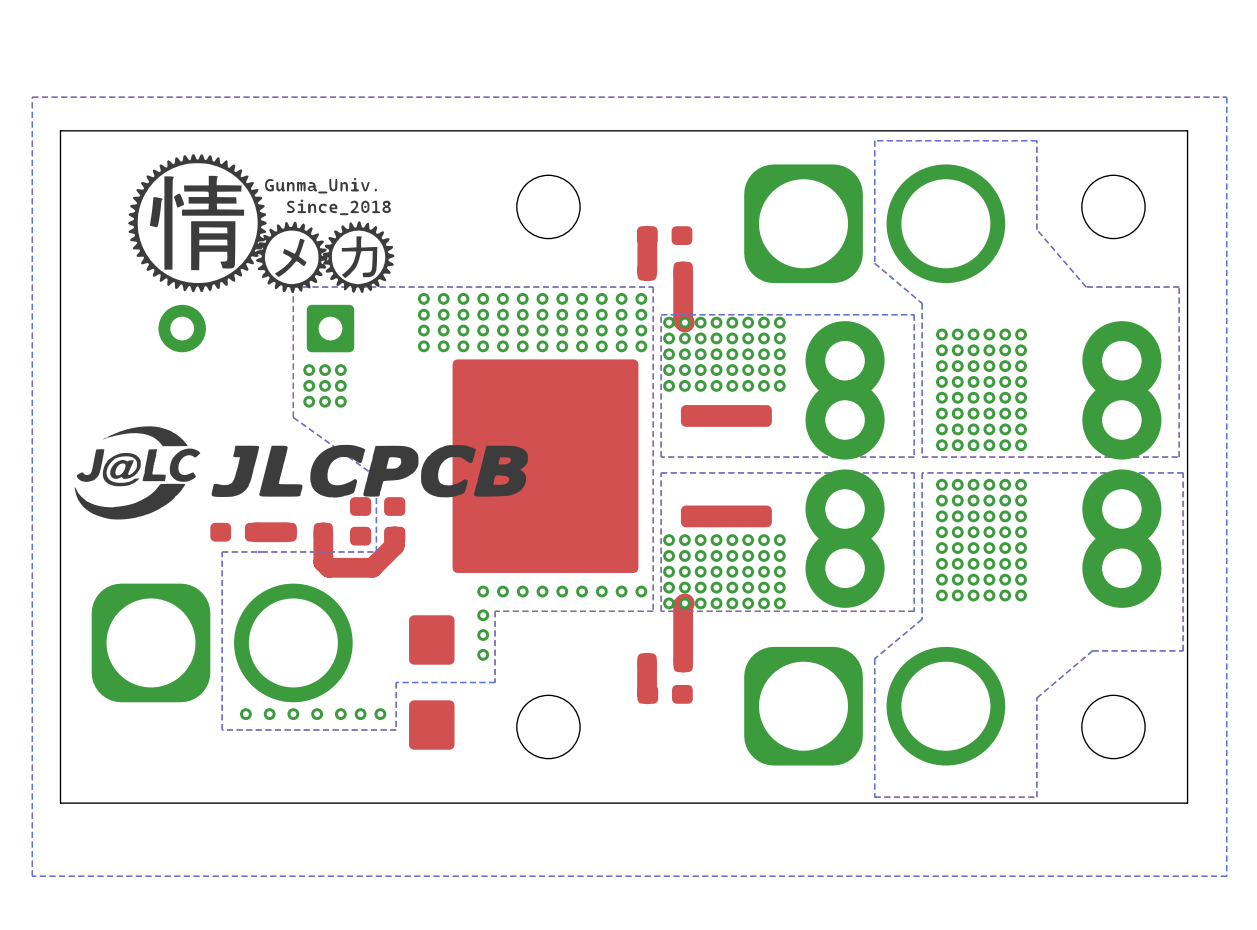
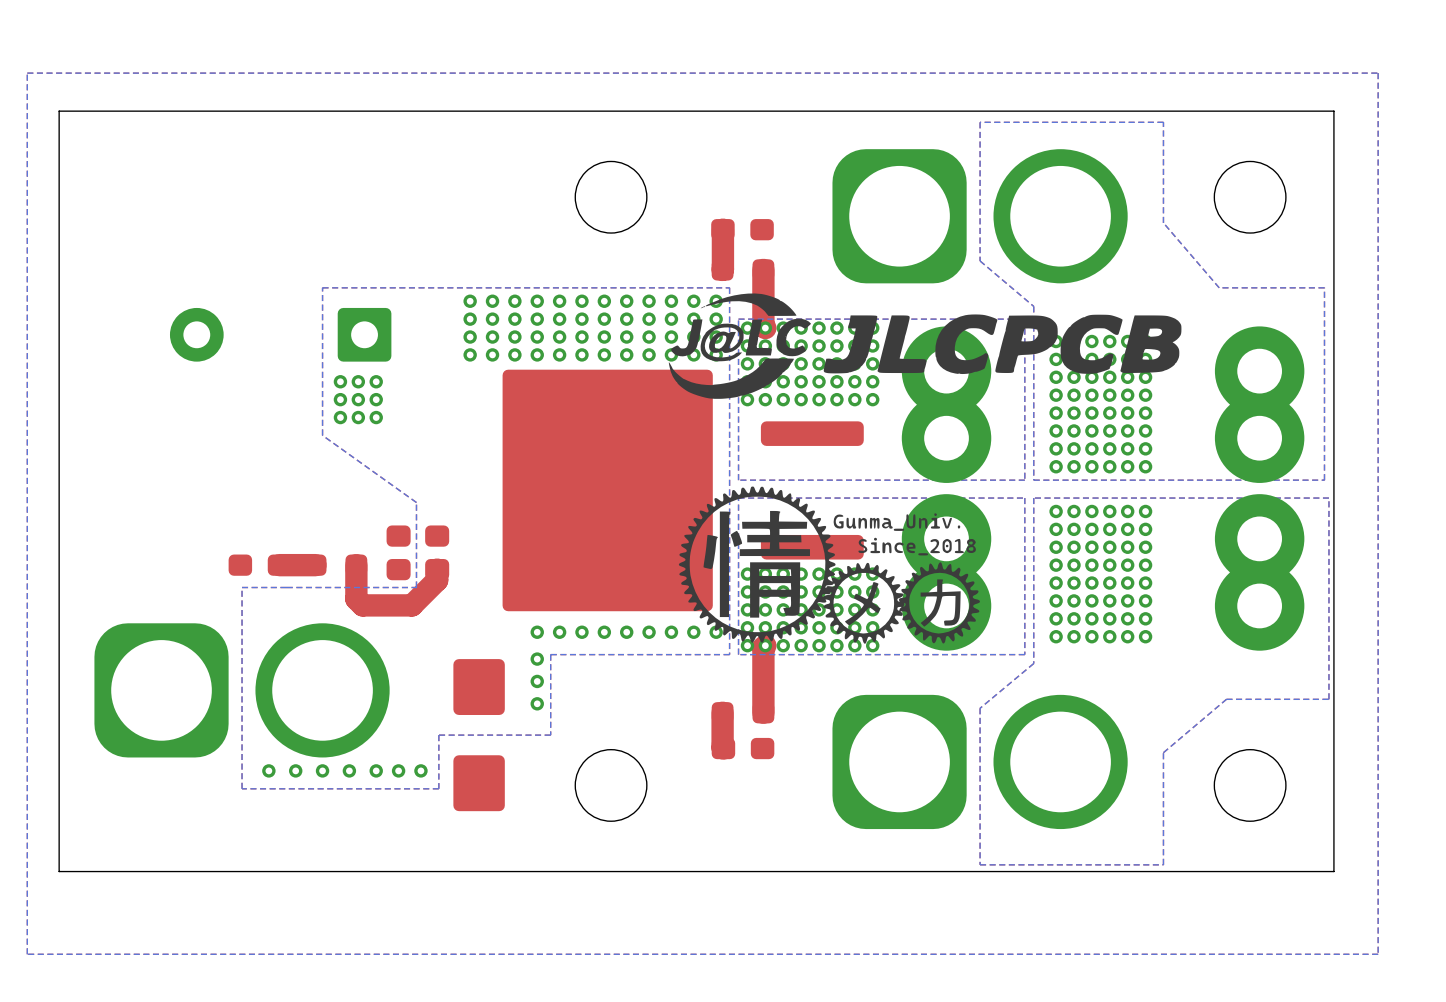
drawing: [128, 154, 395, 294] -> none
drawing: none -> [668, 293, 1182, 399]
drawing: [74, 426, 528, 520] -> none
drawing: none -> [678, 486, 980, 644]

